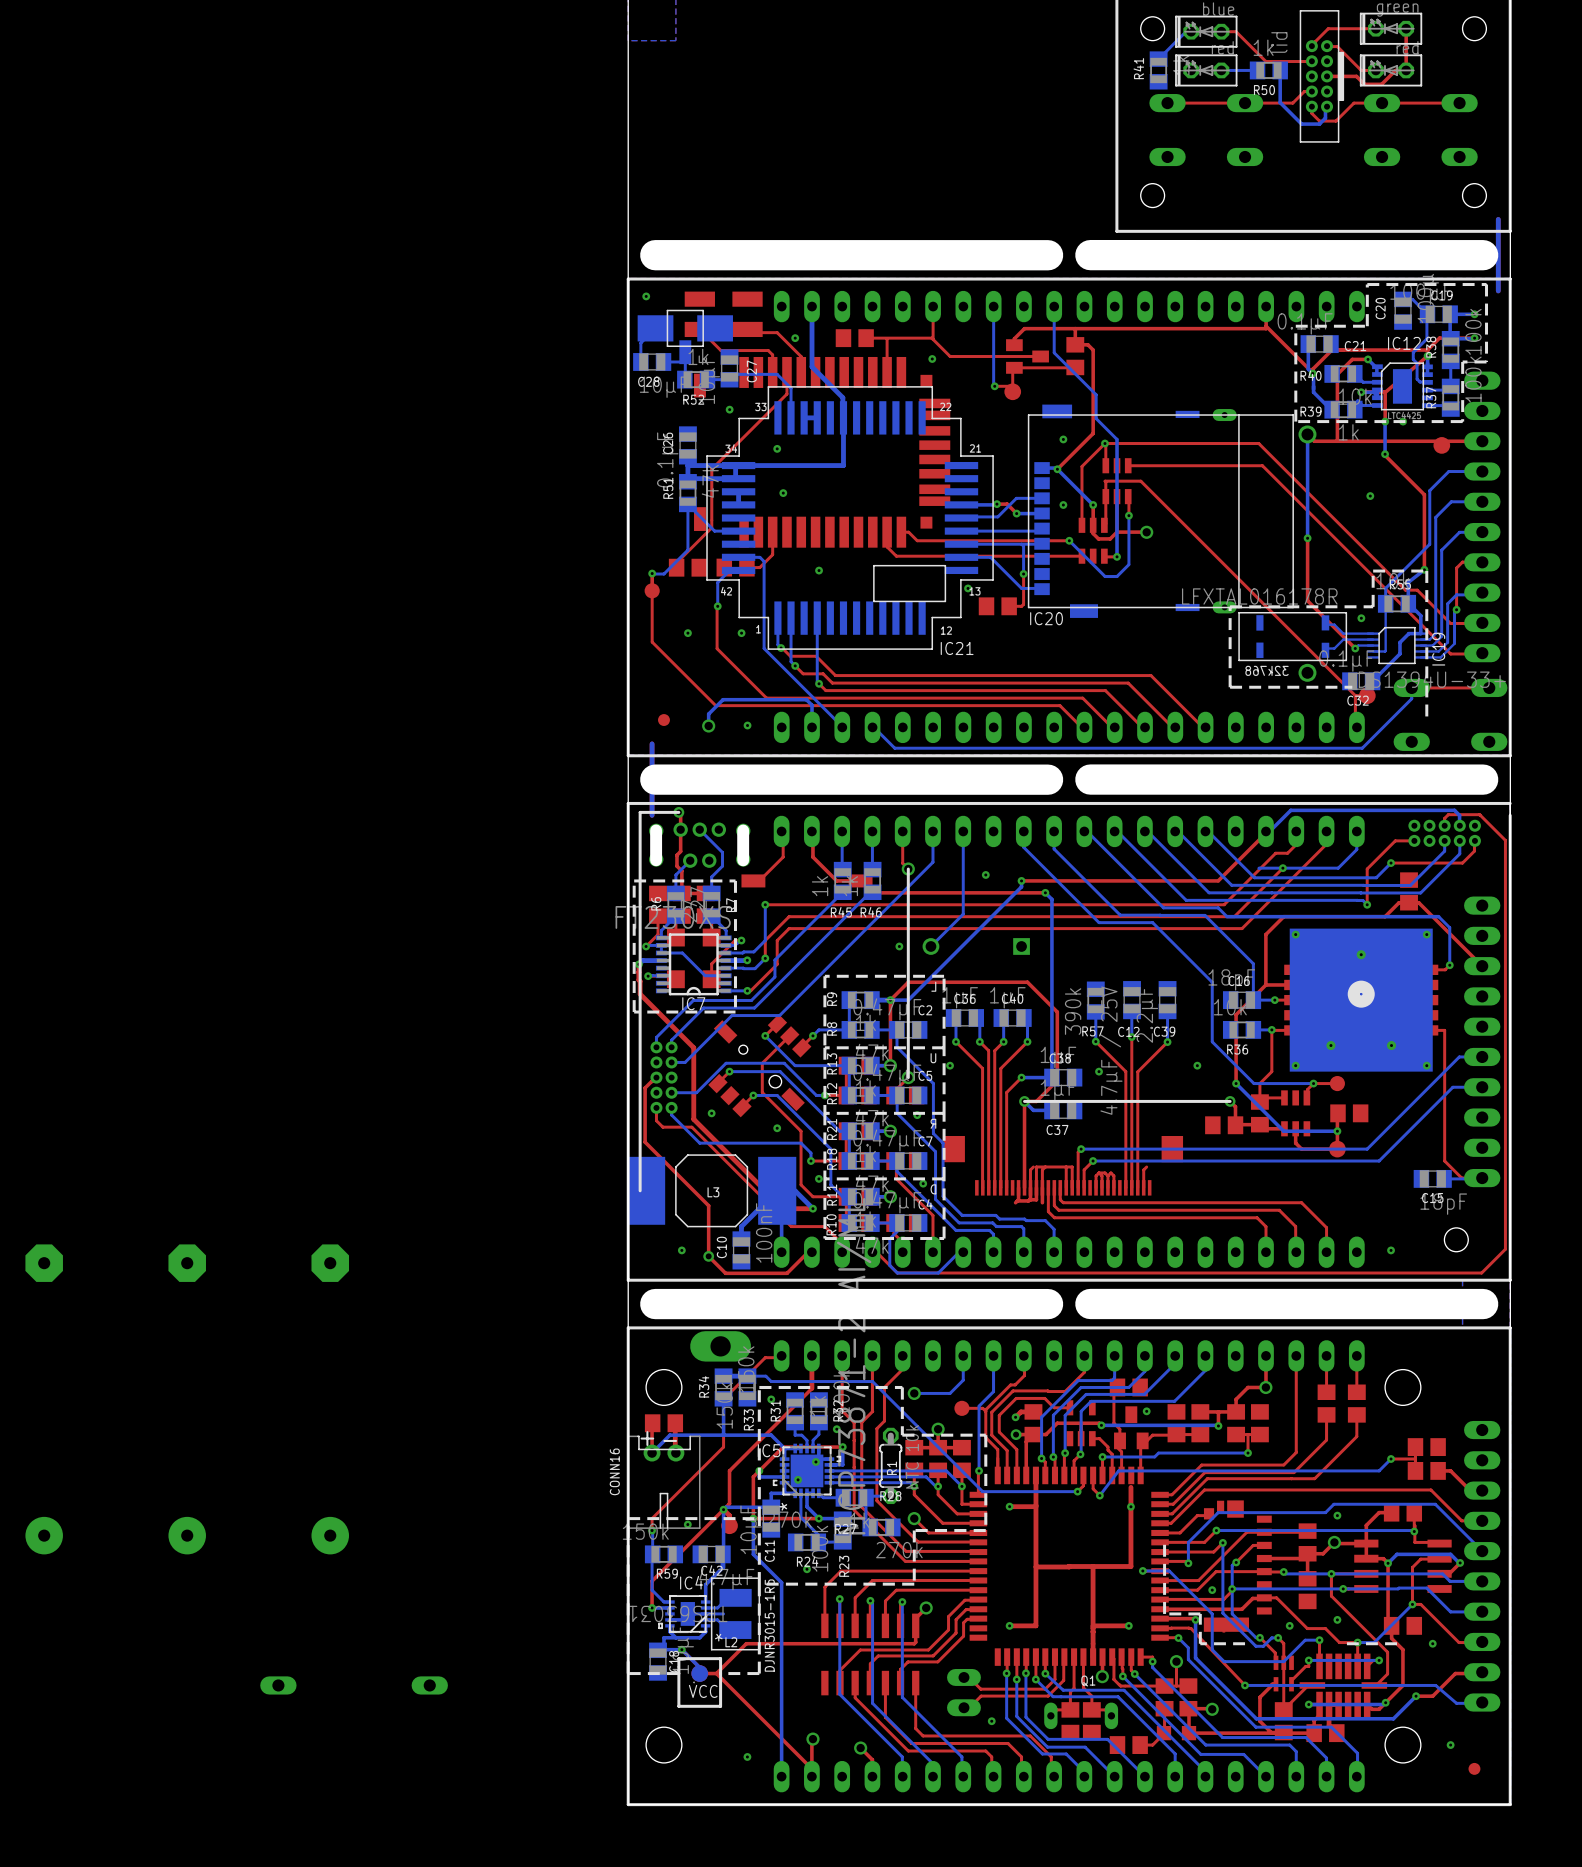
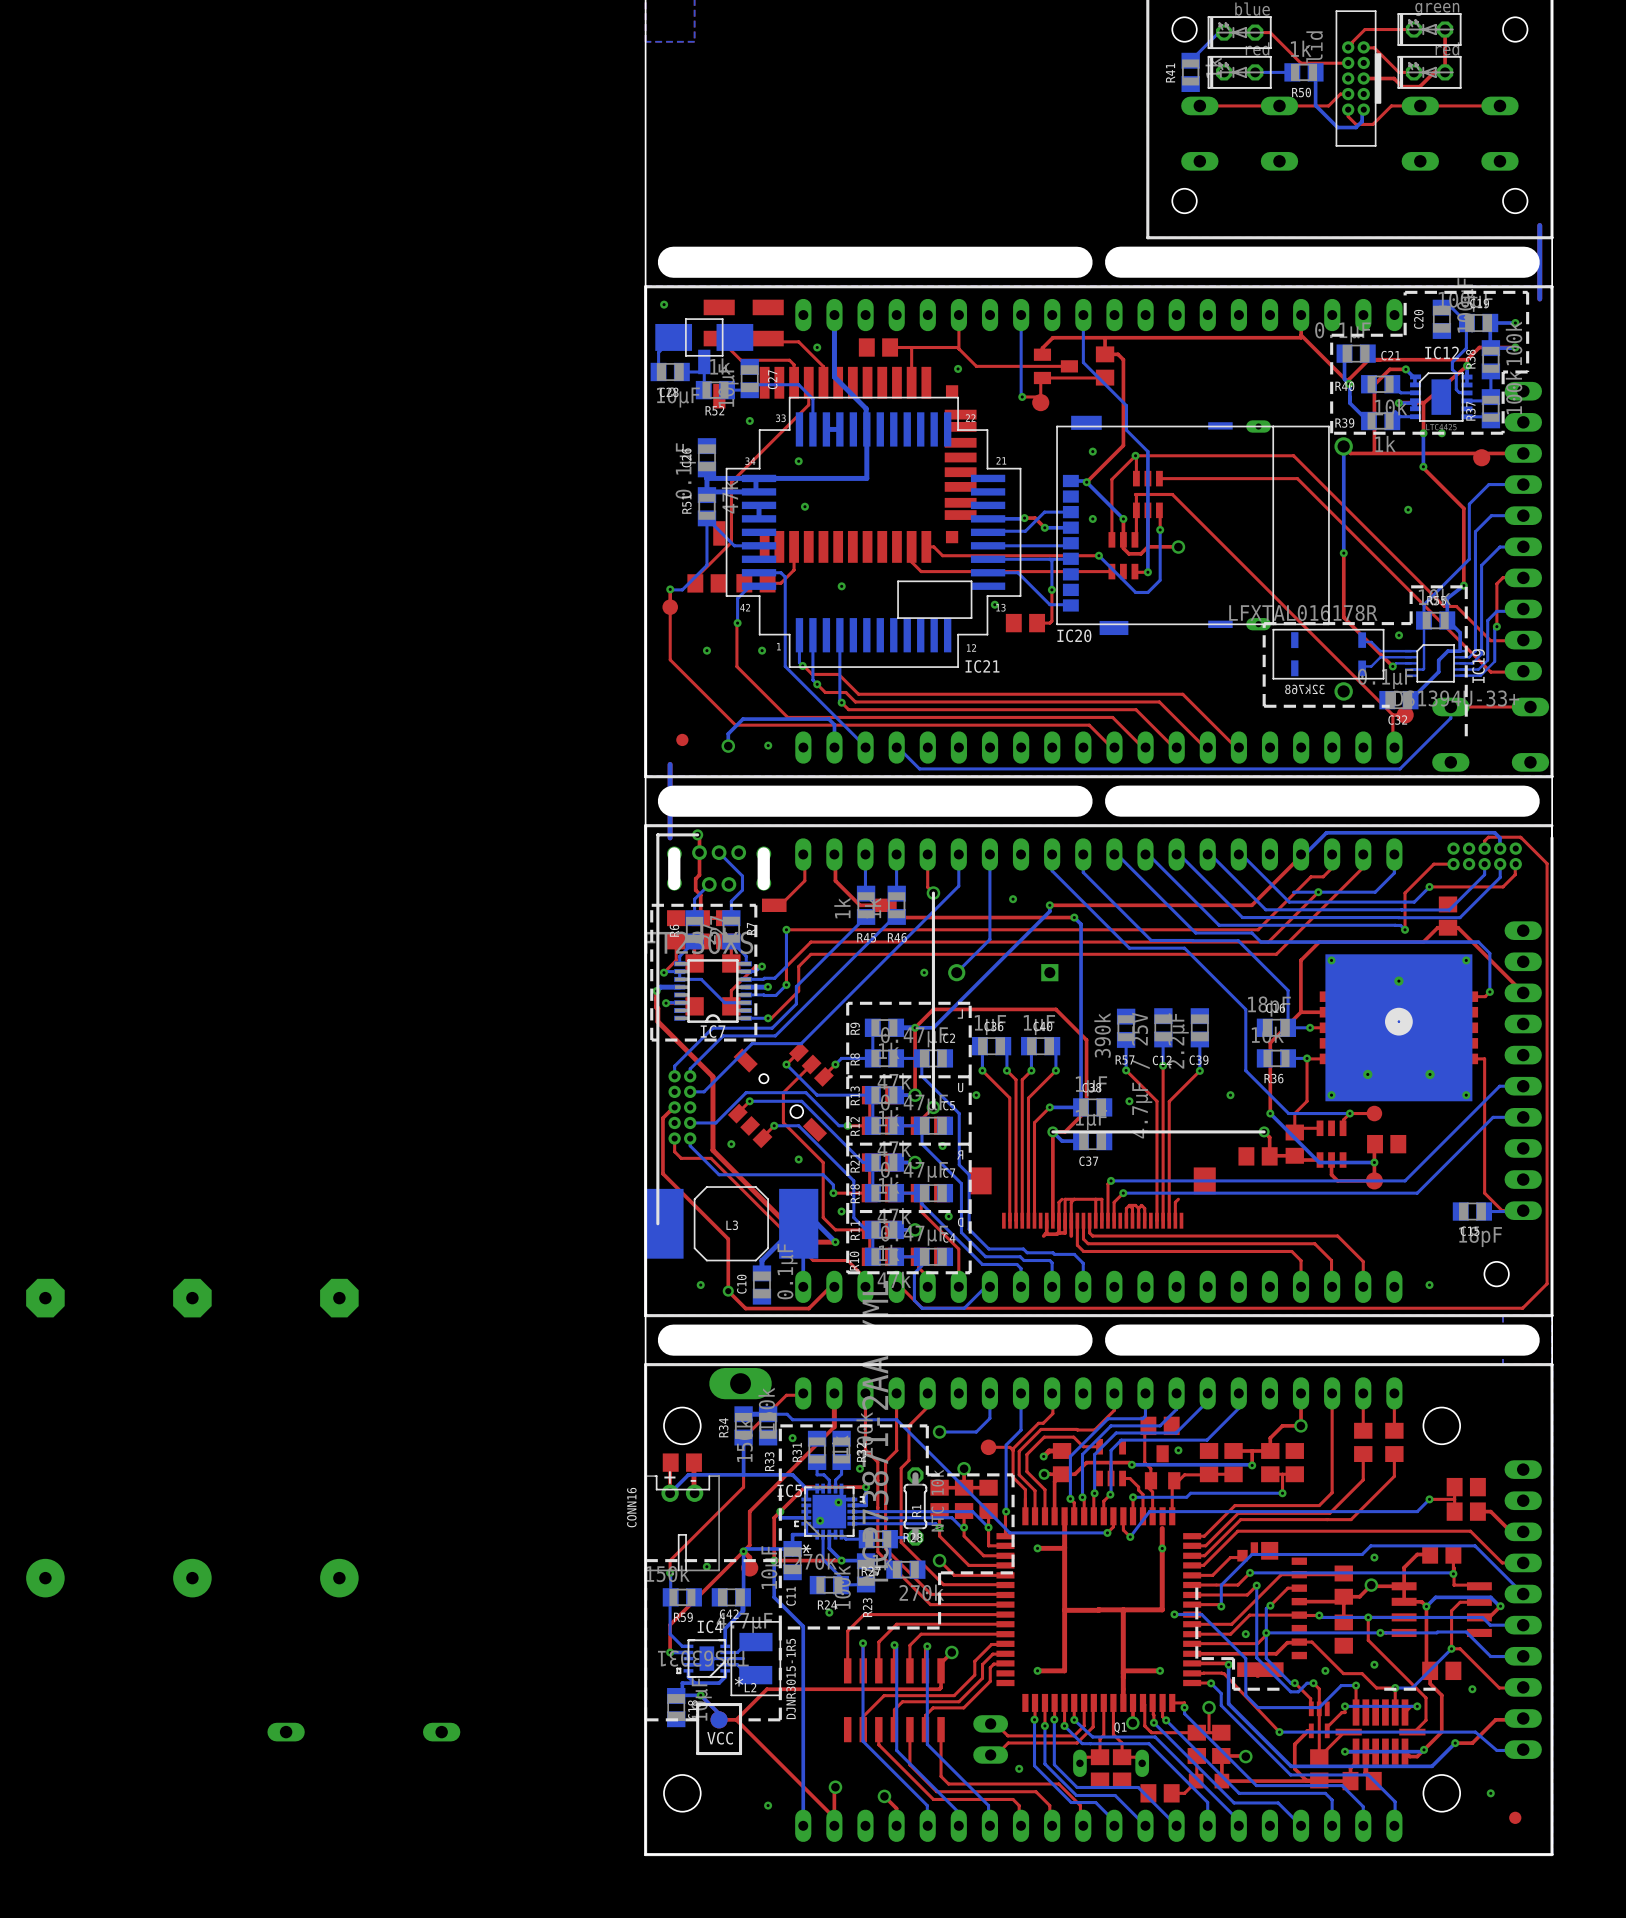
C10 value: 100nF (764, 1232) -> 0.1µF (787, 1271)

